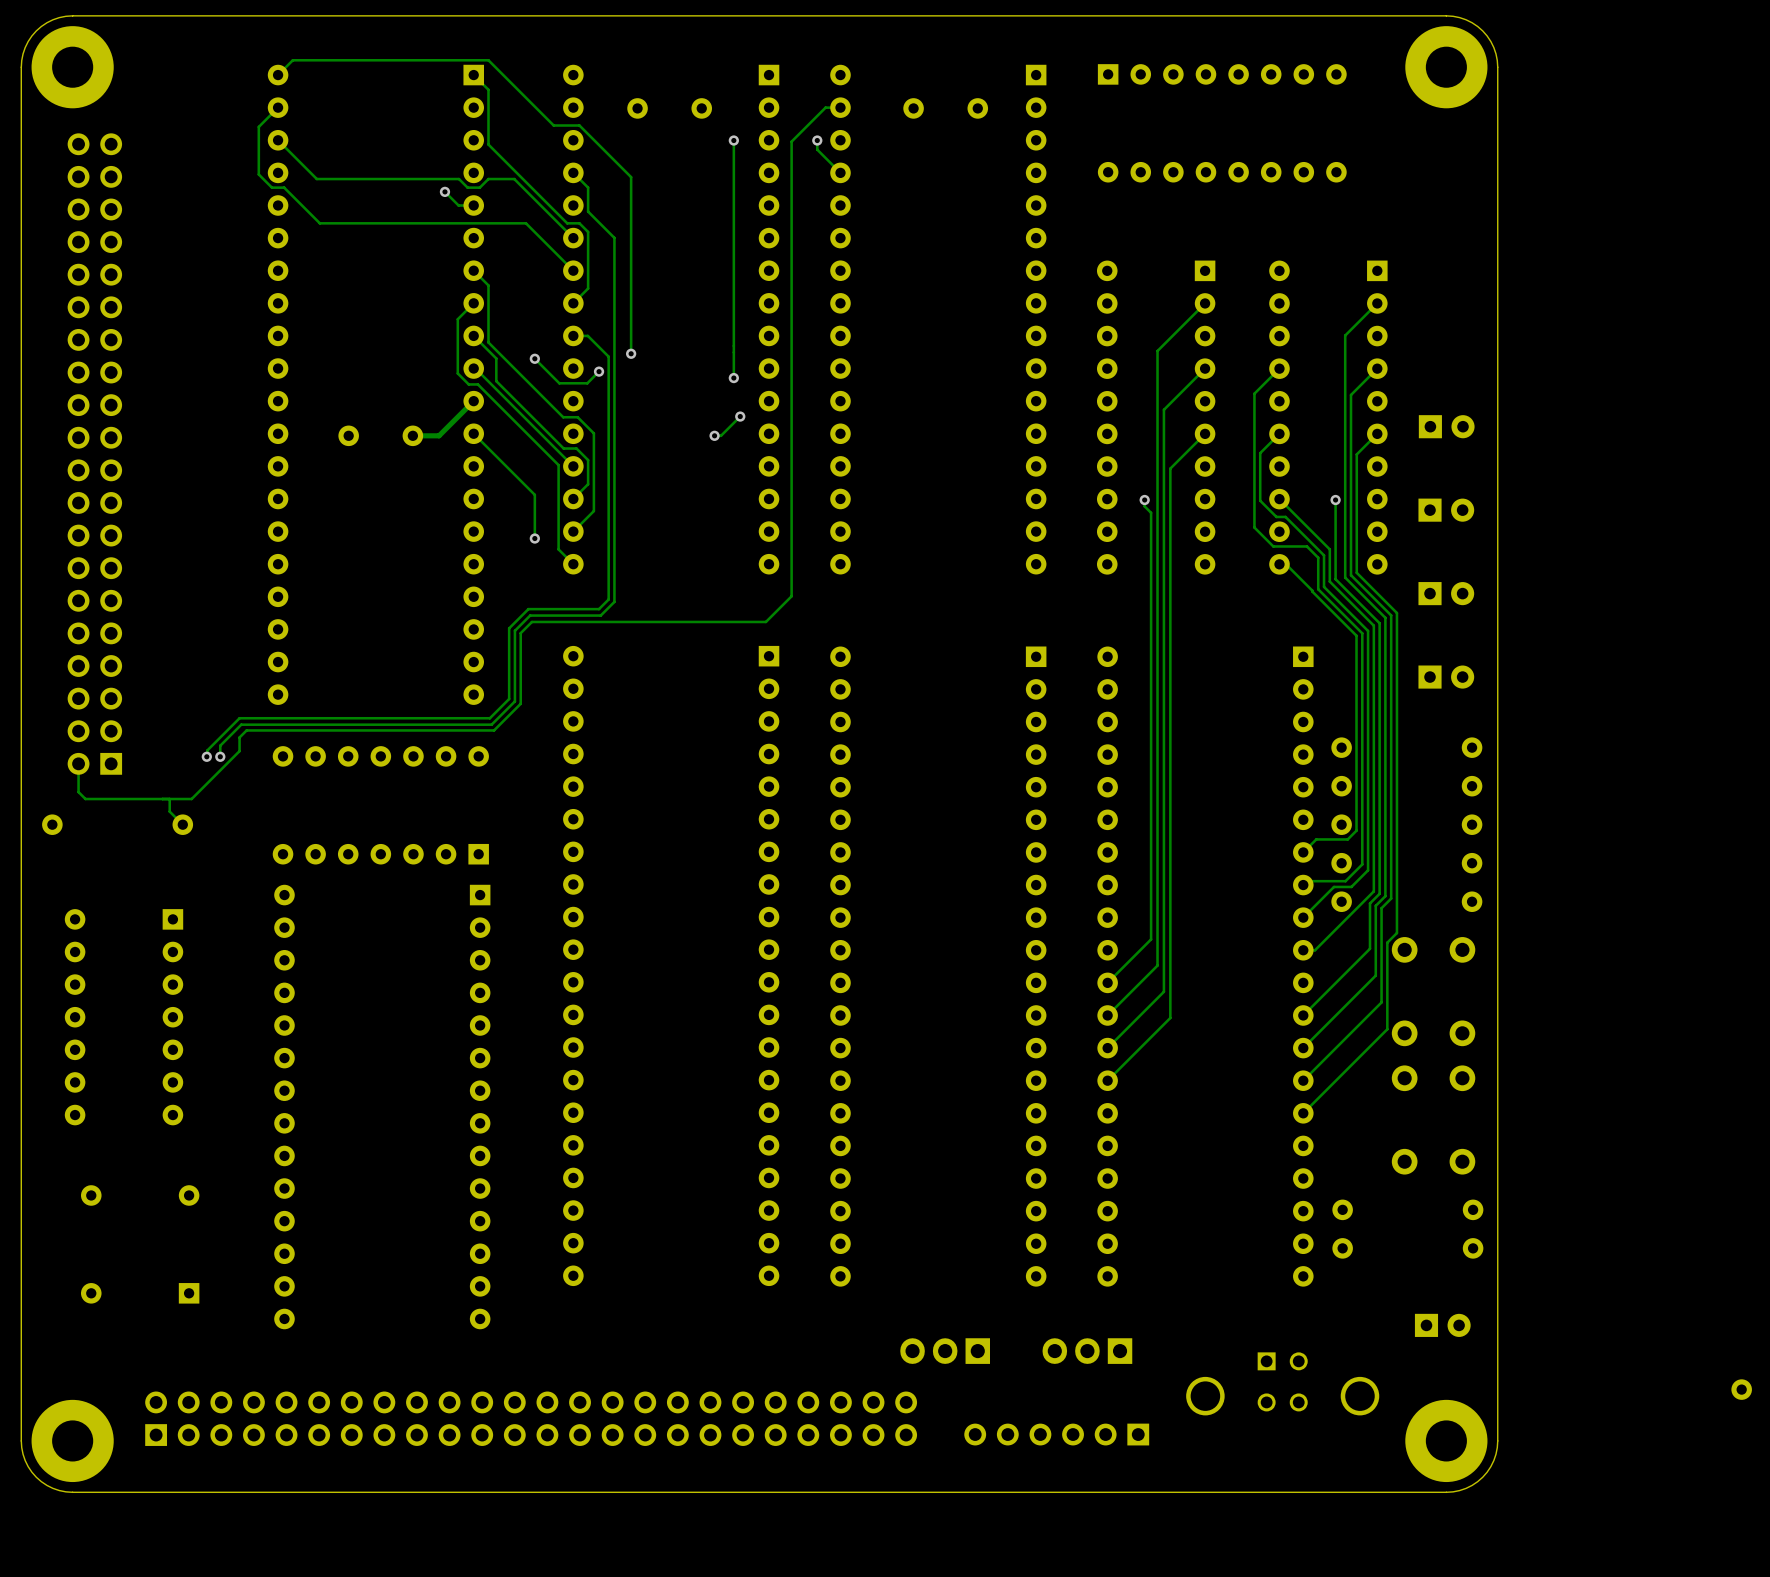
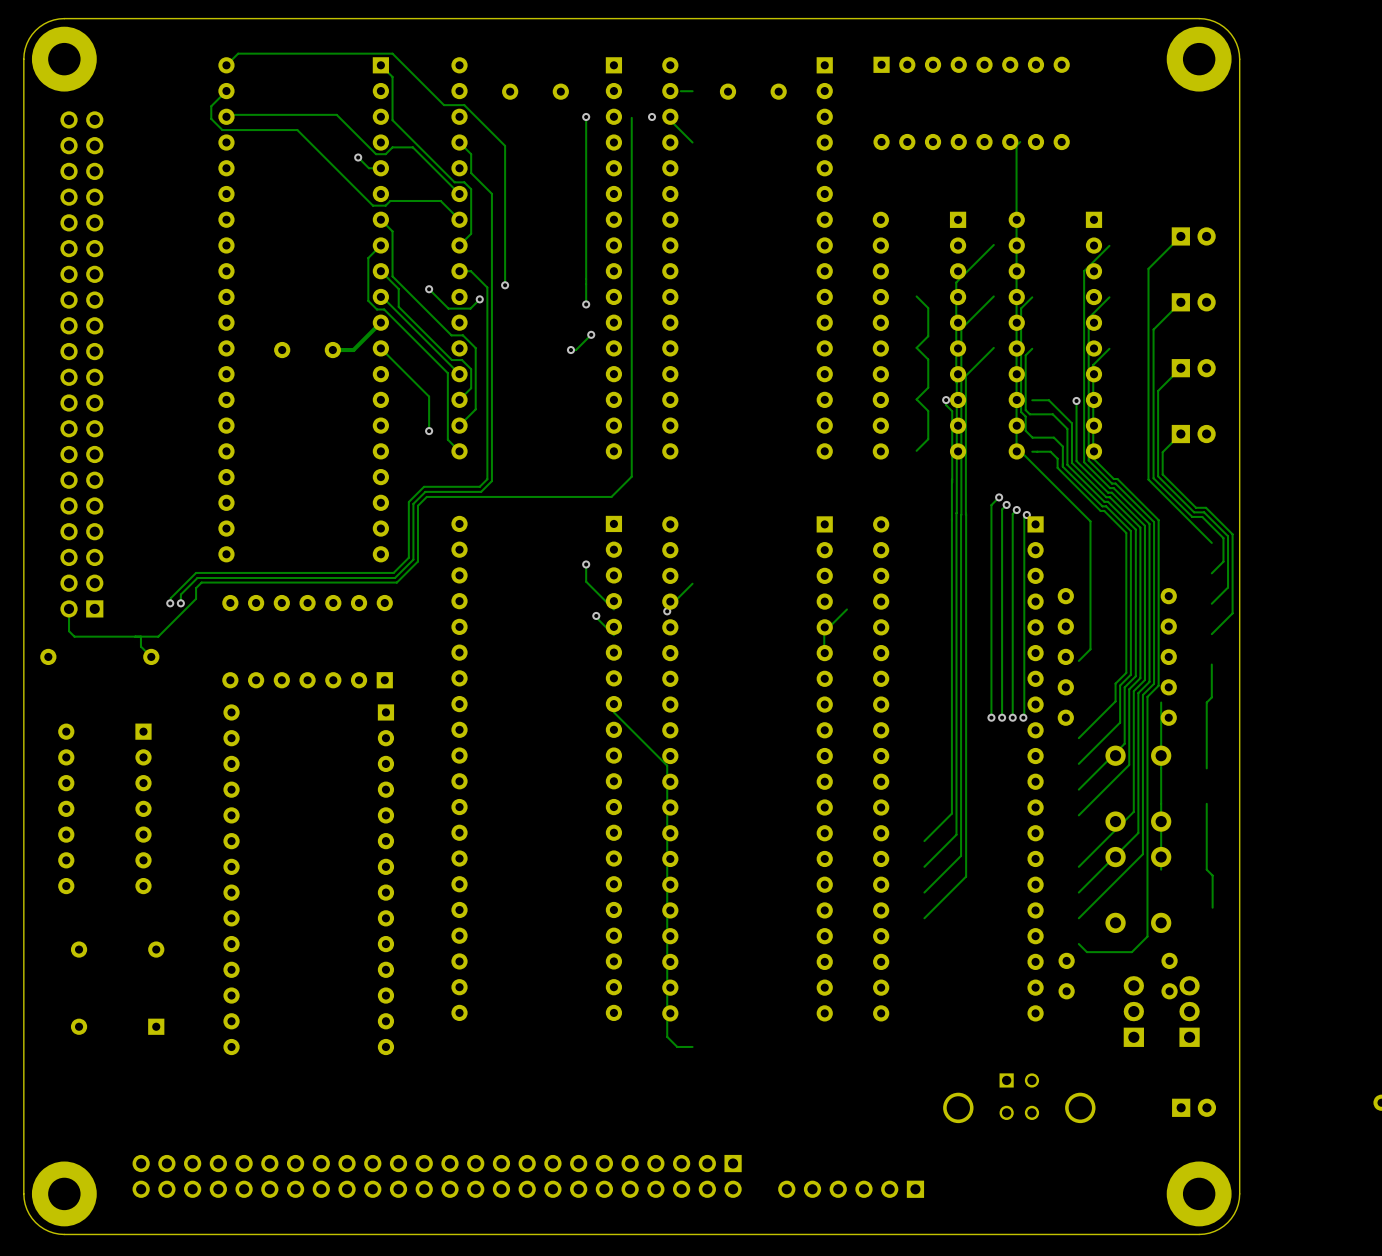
board edge: (1446, 15) (1466, 19) (1482, 30) (1493, 47) (1497, 67) (1497, 1440) (1493, 1460) (1482, 1477) (1466, 1488) (1446, 1492) (72, 1492) (52, 1488) (36, 1477) (25, 1460) (21, 1440) -> (1148, 18) (1199, 18) (1214, 21) (1231, 34) (1239, 53) (1239, 1193) (1236, 1209) (1227, 1222) (1214, 1231) (1199, 1234) (59, 1234) (39, 1226) (26, 1209) (23, 1193) (23, 1143)
part position: (1446, 67) -> (1199, 59)
track: (840, 107) (825, 107) (791, 141) -> none
track: none -> (692, 91) (680, 91)
track: none -> (667, 114) (667, 117) (692, 142)
track: (278, 140) (316, 179) (459, 179) -> (226, 116) (228, 114) (336, 114) (369, 147)
track: (817, 140) (817, 149) (840, 172) -> none
track: (258, 142) (258, 174) (271, 187) (284, 187) (319, 223) (525, 223) (549, 246) -> (211, 118) (222, 130) (297, 130) (372, 205) (385, 205) (390, 200) (440, 200)
track: none -> (1020, 142) (1016, 145) (1016, 447) (1090, 521) (1090, 649) (1078, 660)
track: none -> (1180, 236) (1148, 268) (1148, 479) (1211, 542)
part: none -> (1193, 236)
track: none -> (993, 244) (956, 282) (956, 834) (924, 866)
track: (1205, 303) (1157, 351) (1157, 965) (1107, 1015) -> none
track: (1377, 303) (1345, 335) (1345, 577) (1385, 617) (1385, 896) (1375, 905) (1375, 975) (1303, 1048) -> none
track: none -> (1109, 245) (1084, 271) (1084, 462) (1149, 523) (1149, 681) (1138, 693) (1138, 833) (1078, 892)
track: none -> (916, 296) (928, 308) (928, 336) (916, 347) (928, 359) (928, 387) (916, 399) (928, 411) (928, 439) (916, 450)
track: none -> (993, 296) (961, 328) (961, 855) (924, 892)
track: (1205, 368) (1163, 409) (1163, 991) (1107, 1048) -> none
track: (1279, 368) (1254, 393) (1254, 527) (1273, 546) (1306, 546) (1318, 557) (1318, 589) (1362, 633) (1362, 864) (1345, 881) (1303, 881) -> none
track: (1377, 368) (1350, 394) (1350, 575) (1391, 615) (1391, 898) (1381, 908) (1381, 1002) (1303, 1080) -> none
track: none -> (1032, 297) (1021, 308) (1021, 412) (1025, 416) (1025, 430) (1032, 437) (1053, 437) (1062, 446) (1062, 466) (1102, 506) (1106, 506) (1130, 531) (1130, 674) (1120, 685) (1120, 722) (1078, 763)
track: none -> (1109, 297) (1088, 318) (1088, 460) (1111, 483) (1115, 483) (1154, 522) (1154, 683) (1142, 694) (1142, 854) (1078, 918)
track: none -> (1180, 302) (1153, 329) (1153, 478) (1192, 516) (1202, 516) (1223, 538) (1223, 561) (1211, 573)
part: none -> (1193, 302)
part: (1446, 426) -> none
track: (1205, 433) (1170, 468) (1170, 1017) (1107, 1080) -> none
track: none -> (993, 347) (965, 375) (966, 515)
track: (1279, 433) (1260, 453) (1260, 500) (1276, 516) (1285, 516) (1324, 555) (1324, 586) (1368, 630) (1368, 870) (1351, 886) (1333, 886) (1303, 917) -> none
track: (1377, 433) (1356, 454) (1356, 572) (1396, 613) (1396, 933) (1387, 942) (1387, 1029) (1303, 1113) -> none
track: none -> (1032, 348) (1025, 355) (1025, 410) (1029, 414) (1052, 414) (1067, 428) (1067, 464) (1135, 529) (1135, 676) (1124, 687) (1124, 743) (1078, 789)
track: none -> (1109, 348) (1093, 364) (1093, 458) (1113, 479) (1117, 479) (1158, 520) (1158, 685) (1147, 696) (1147, 936) (1131, 952) (1086, 952) (1078, 944)
track: none -> (1180, 368) (1158, 390) (1158, 476) (1194, 512) (1204, 512) (1228, 536) (1228, 587) (1211, 603)
part: none -> (1193, 368)
track: none -> (946, 400) (946, 405) (952, 411) (952, 482)
track: (1279, 499) (1329, 549) (1329, 581) (1373, 625) (1373, 891) (1315, 950) (1303, 950) -> none
track: none -> (1032, 400) (1048, 400) (1071, 423) (1071, 462) (1140, 527) (1140, 678) (1129, 689) (1129, 764) (1078, 815)
track: (1144, 500) (1144, 506) (1151, 512) (1151, 939) (1107, 982) -> none
via position: (1144, 500) -> (946, 400)
track: (1335, 500) (1335, 579) (1379, 623) (1379, 893) (1369, 903) (1369, 948) (1303, 1015) -> none
via position: (1335, 500) -> (1076, 400)
track: none -> (1076, 400) (1076, 461) (1144, 525) (1144, 680) (1133, 691) (1133, 811) (1078, 866)
part: (1446, 510) -> none
track: none -> (1180, 434) (1162, 452) (1162, 474) (1196, 507) (1206, 507) (1232, 534) (1232, 613) (1211, 634)
part: none -> (1193, 434)
track: (1279, 564) (1286, 564) (1356, 635) (1356, 830) (1347, 839) (1316, 839) (1303, 852) -> none
track: none -> (1032, 451) (1050, 451) (1057, 458) (1057, 467) (1100, 510) (1104, 510) (1126, 532) (1126, 672) (1115, 683) (1115, 701) (1078, 738)
part: (1446, 593) -> none
track: none -> (952, 479) (951, 813) (924, 841)
track: none -> (999, 497) (991, 505) (991, 717)
via: none -> (999, 497)
track: none -> (1006, 504) (1002, 509) (1002, 717)
via: none -> (1006, 504)
track: none -> (1016, 510) (1012, 514) (1012, 717)
via: none -> (1016, 510)
track: none -> (966, 513) (966, 876) (924, 918)
track: none -> (1026, 515) (1024, 517) (1023, 717)
via: none -> (1026, 515)
part: (1446, 677) -> none
track: none -> (586, 564) (586, 581) (613, 609)
via: none -> (586, 564)
track: none -> (692, 583) (667, 609) (667, 611)
track: none -> (846, 609) (824, 632) (824, 656)
via: none -> (667, 611)
track: none -> (596, 615) (613, 635)
via: none -> (596, 615)
track: none -> (1211, 664) (1211, 697) (1206, 702) (1206, 768)
track: none -> (1161, 702) (1161, 869)
track: none -> (613, 712) (667, 765) (667, 1036) (677, 1046) (692, 1046)
via: none -> (991, 717)
via: none -> (1002, 717)
via: none -> (1012, 717)
via: none -> (1023, 717)
track: none -> (1206, 803) (1206, 869) (1212, 875) (1212, 907)
part: none -> (1133, 1011)
part: none -> (1189, 1011)
part position: (1442, 1325) -> (1194, 1107)
part: (945, 1351) -> none
part: (1087, 1351) -> none
part rotation: 0° (531, 1418) -> 180° (437, 1176)
part position: (1056, 1434) -> (851, 1189)
part position: (72, 1440) -> (64, 1193)
part position: (1446, 1440) -> (1199, 1193)

